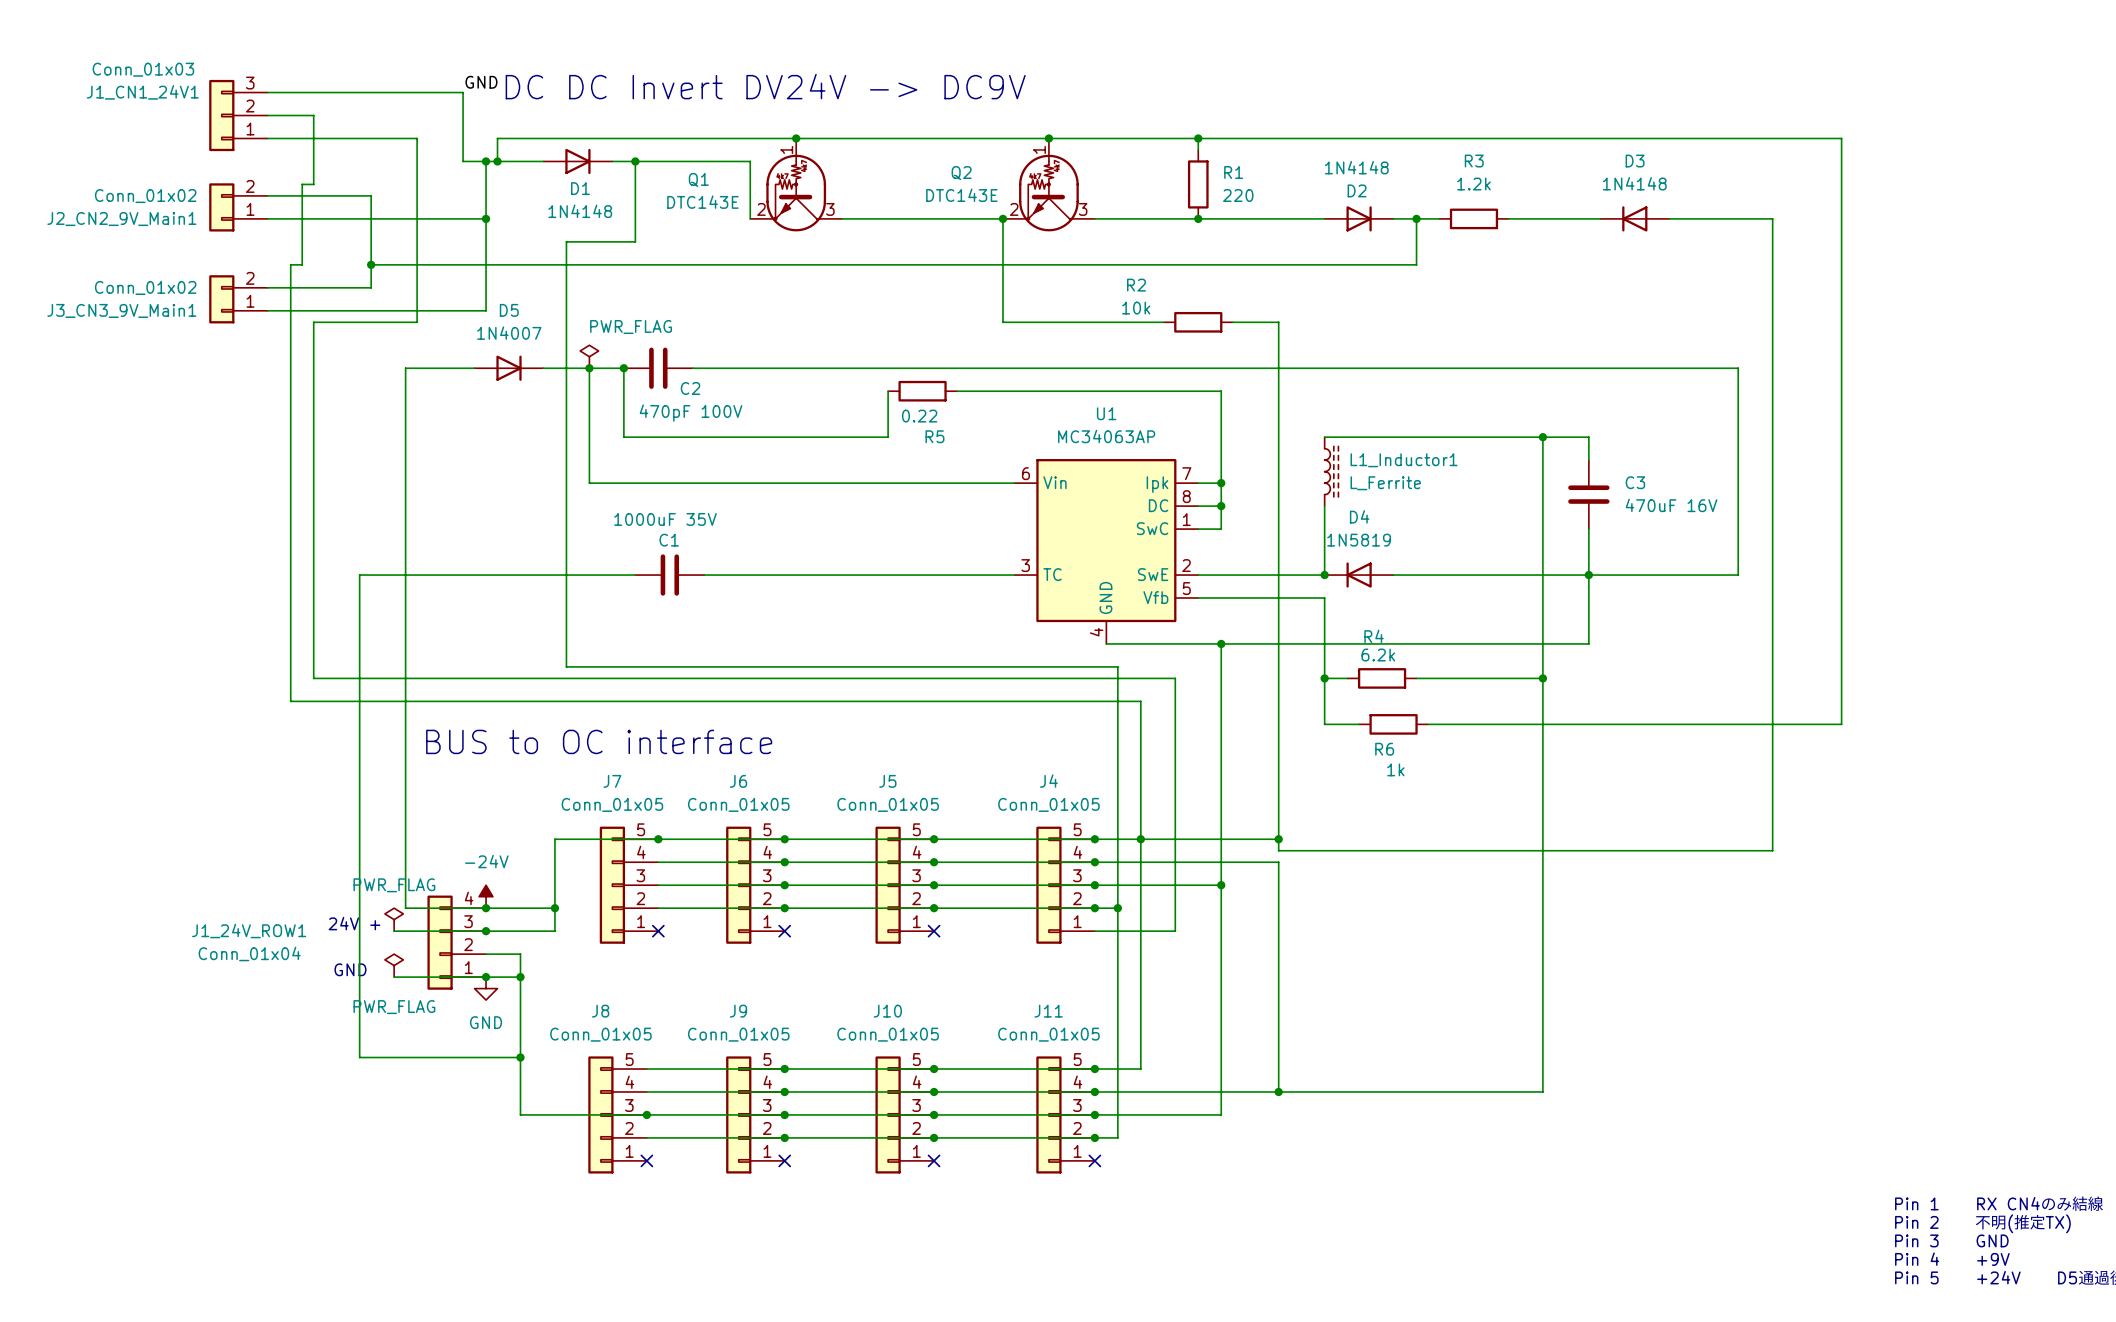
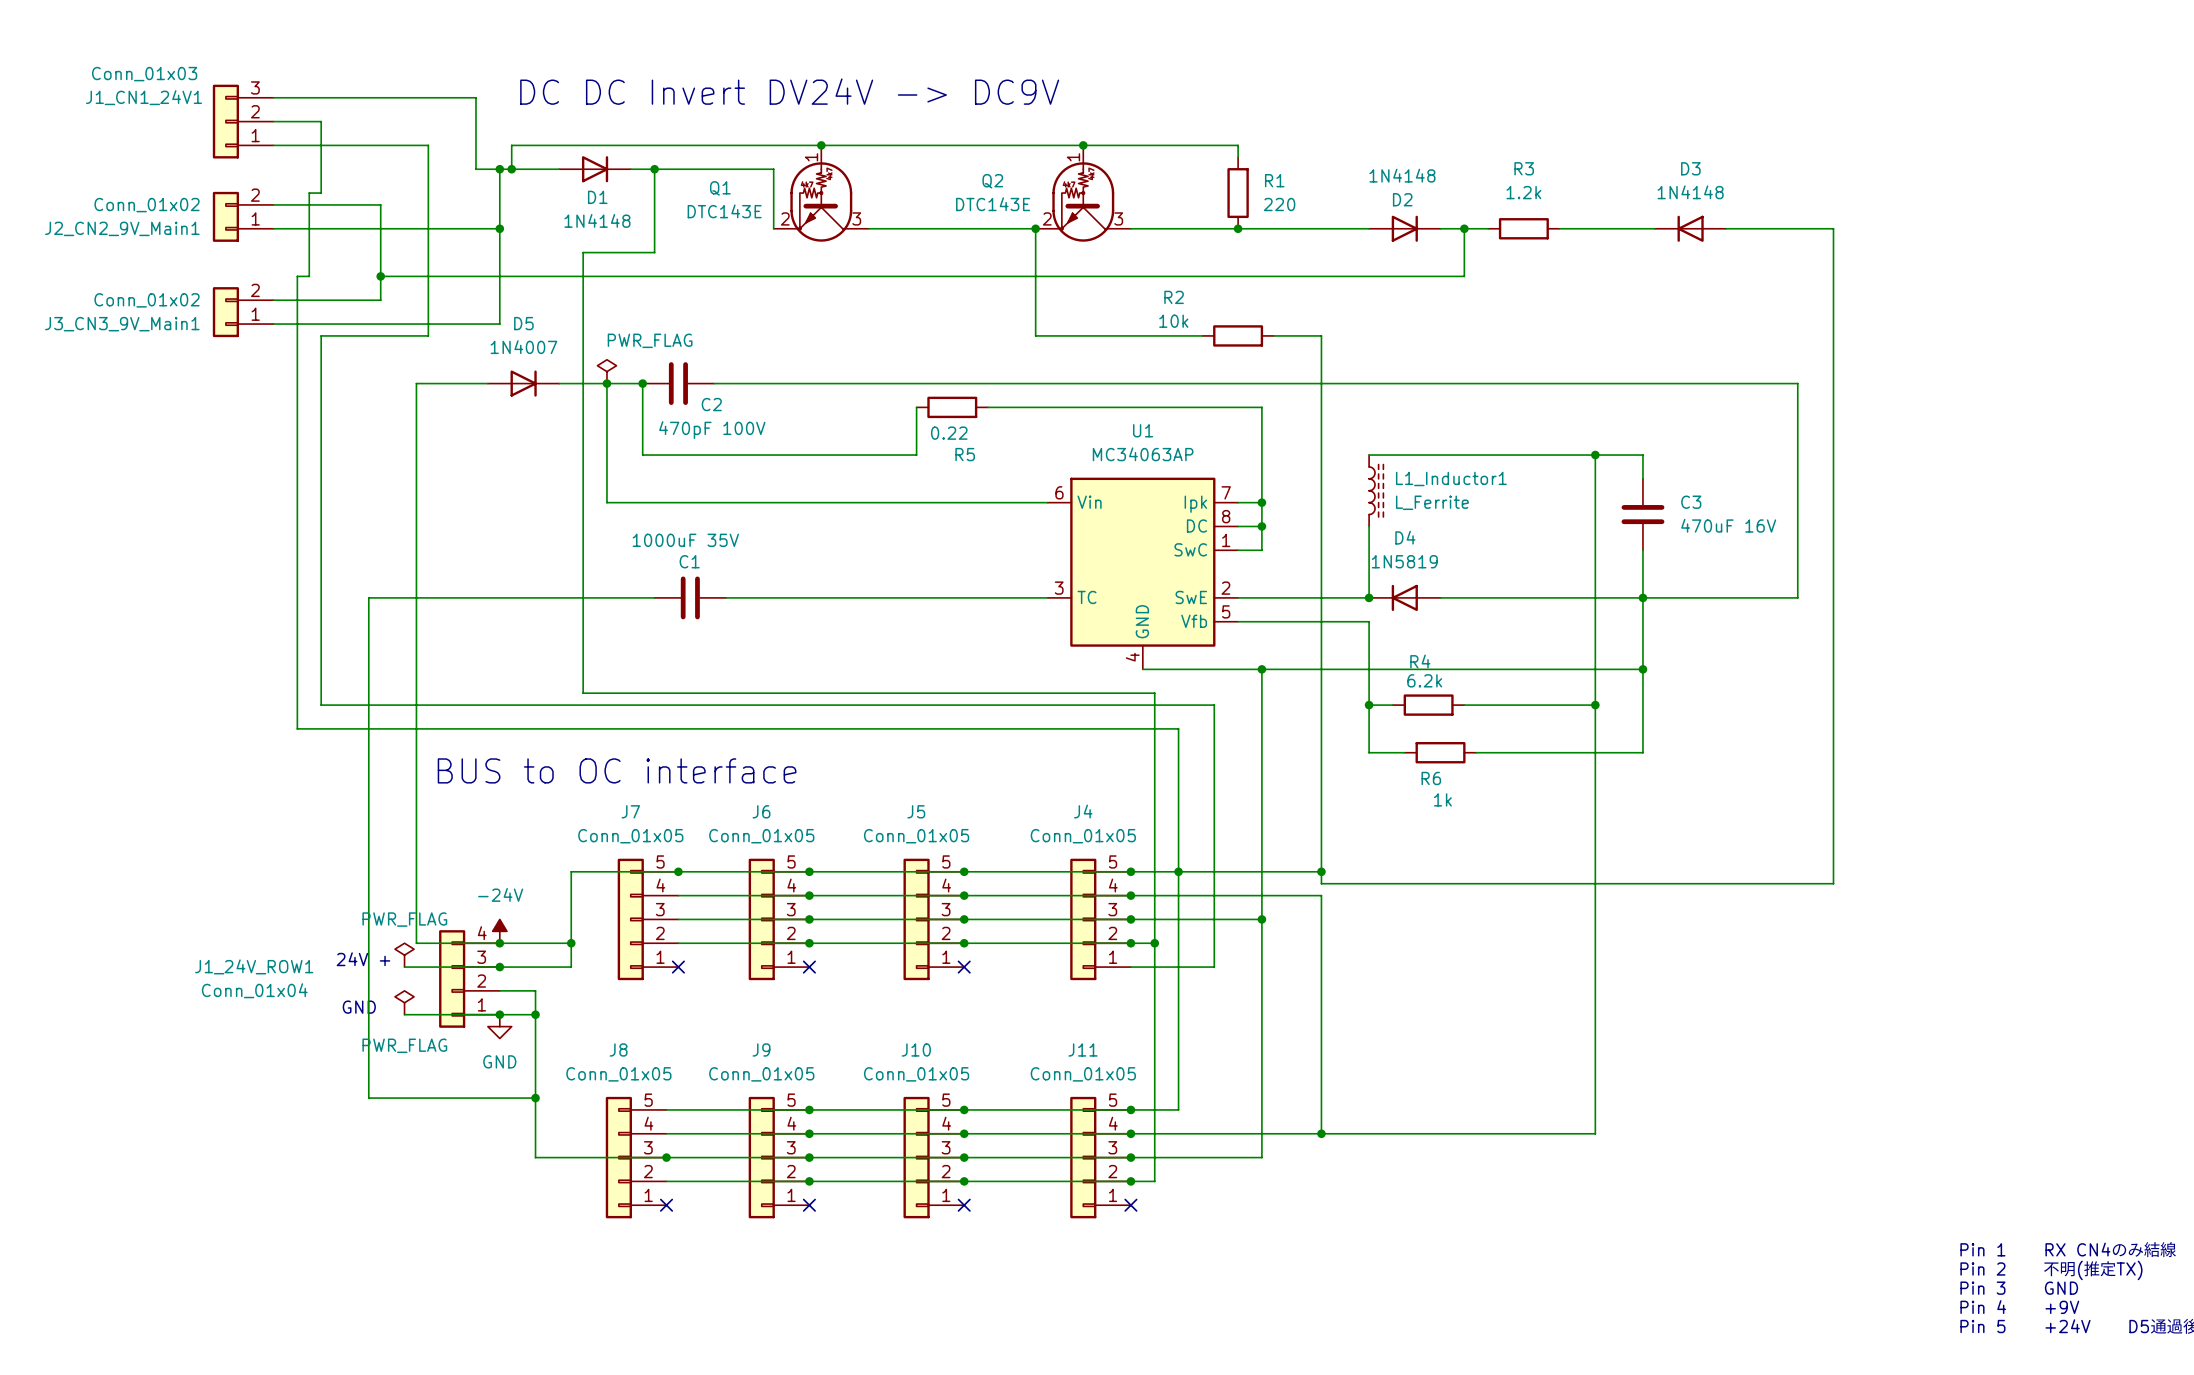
label: GND (481, 82) -> none
wire: (1198, 138) (1841, 138) (1841, 724) (1588, 724) -> (1642, 669) (1642, 752)
junction: (1198, 138) -> none
junction: none -> (1642, 669)

